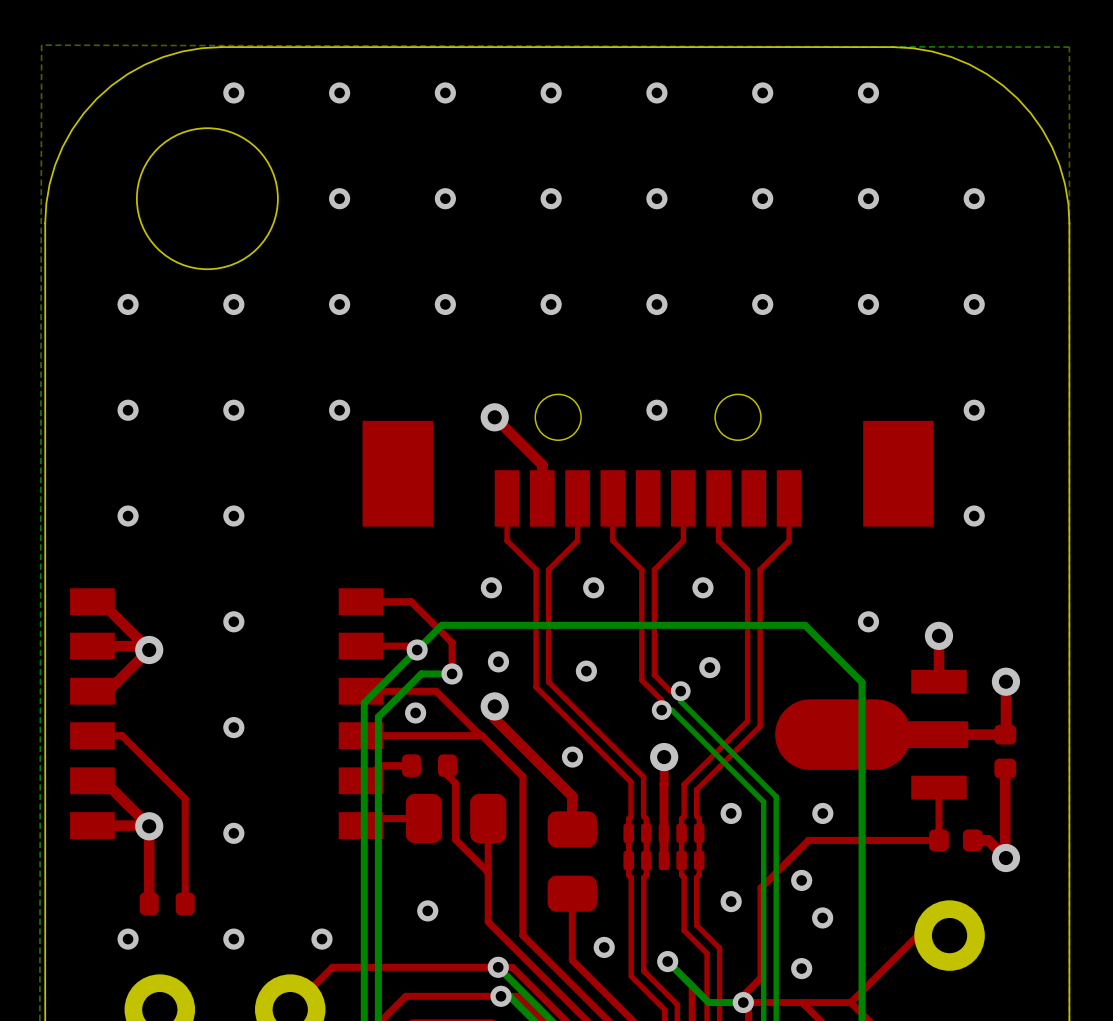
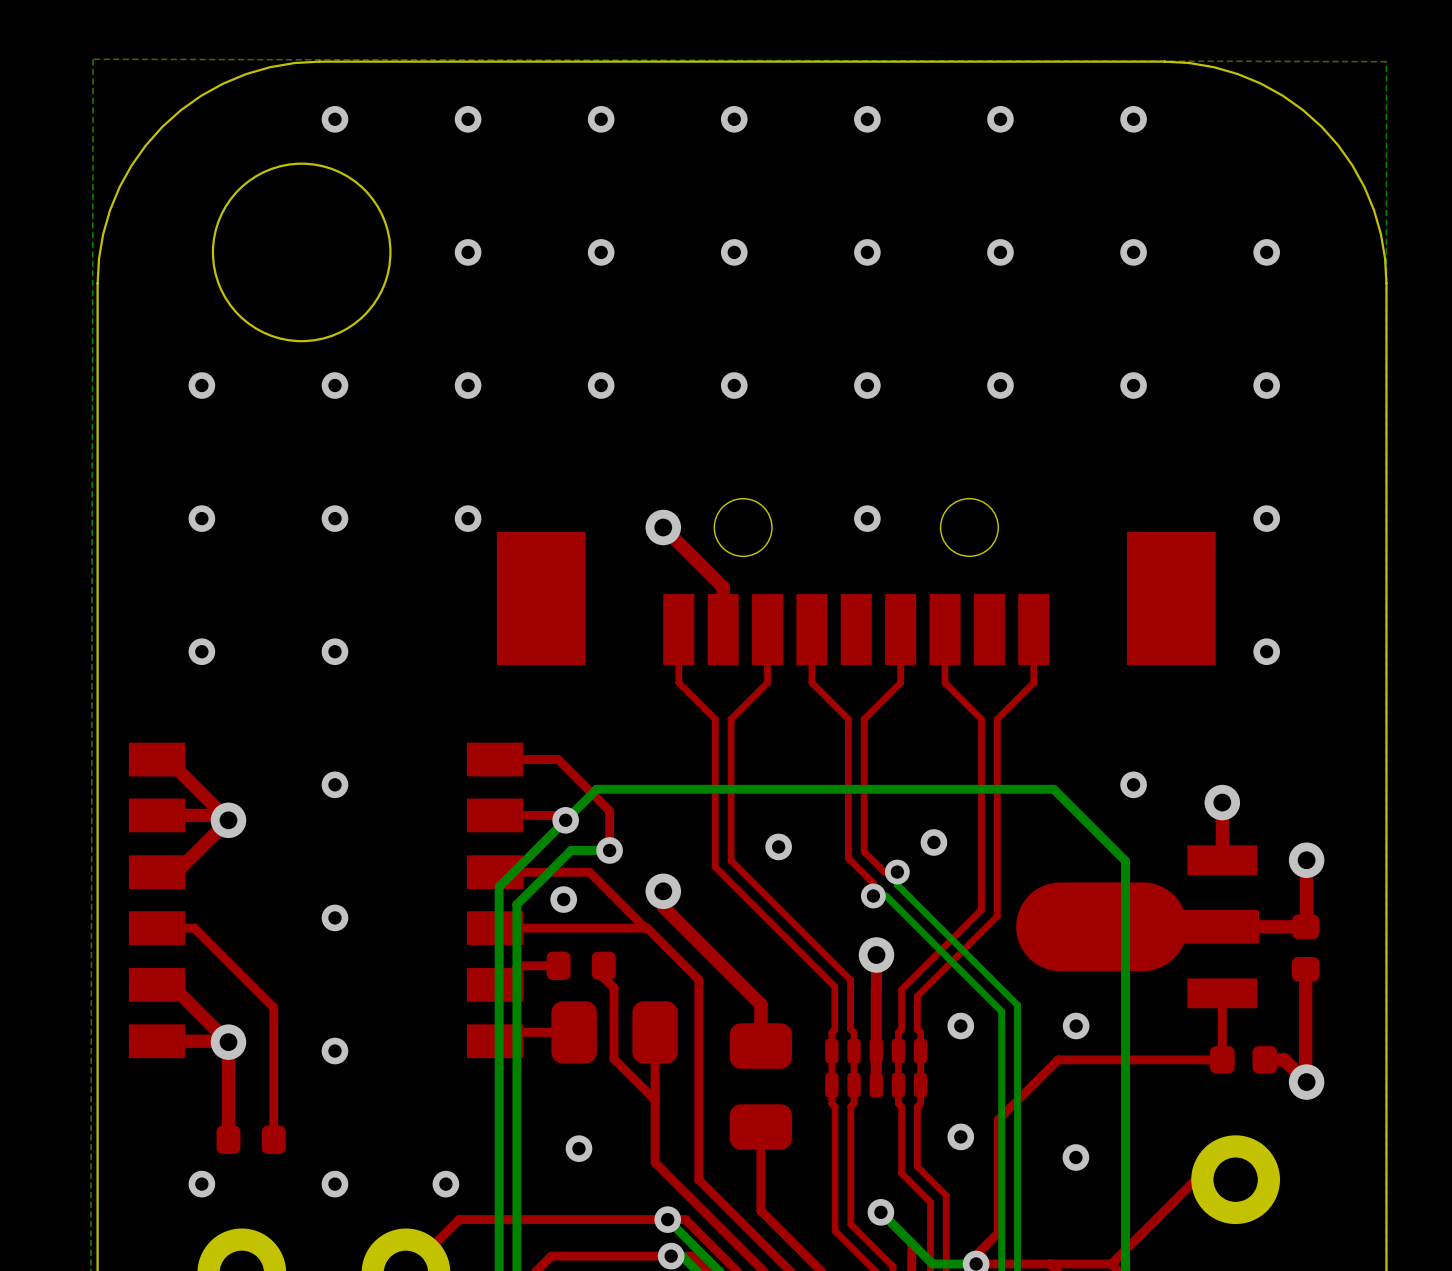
via: (491, 587) -> none
via: (593, 587) -> none
via: (702, 587) -> none
via: (498, 661) -> none
via: (572, 757) -> none
via: (801, 880) -> none
via: (604, 947) -> none
via: (801, 968) -> none

